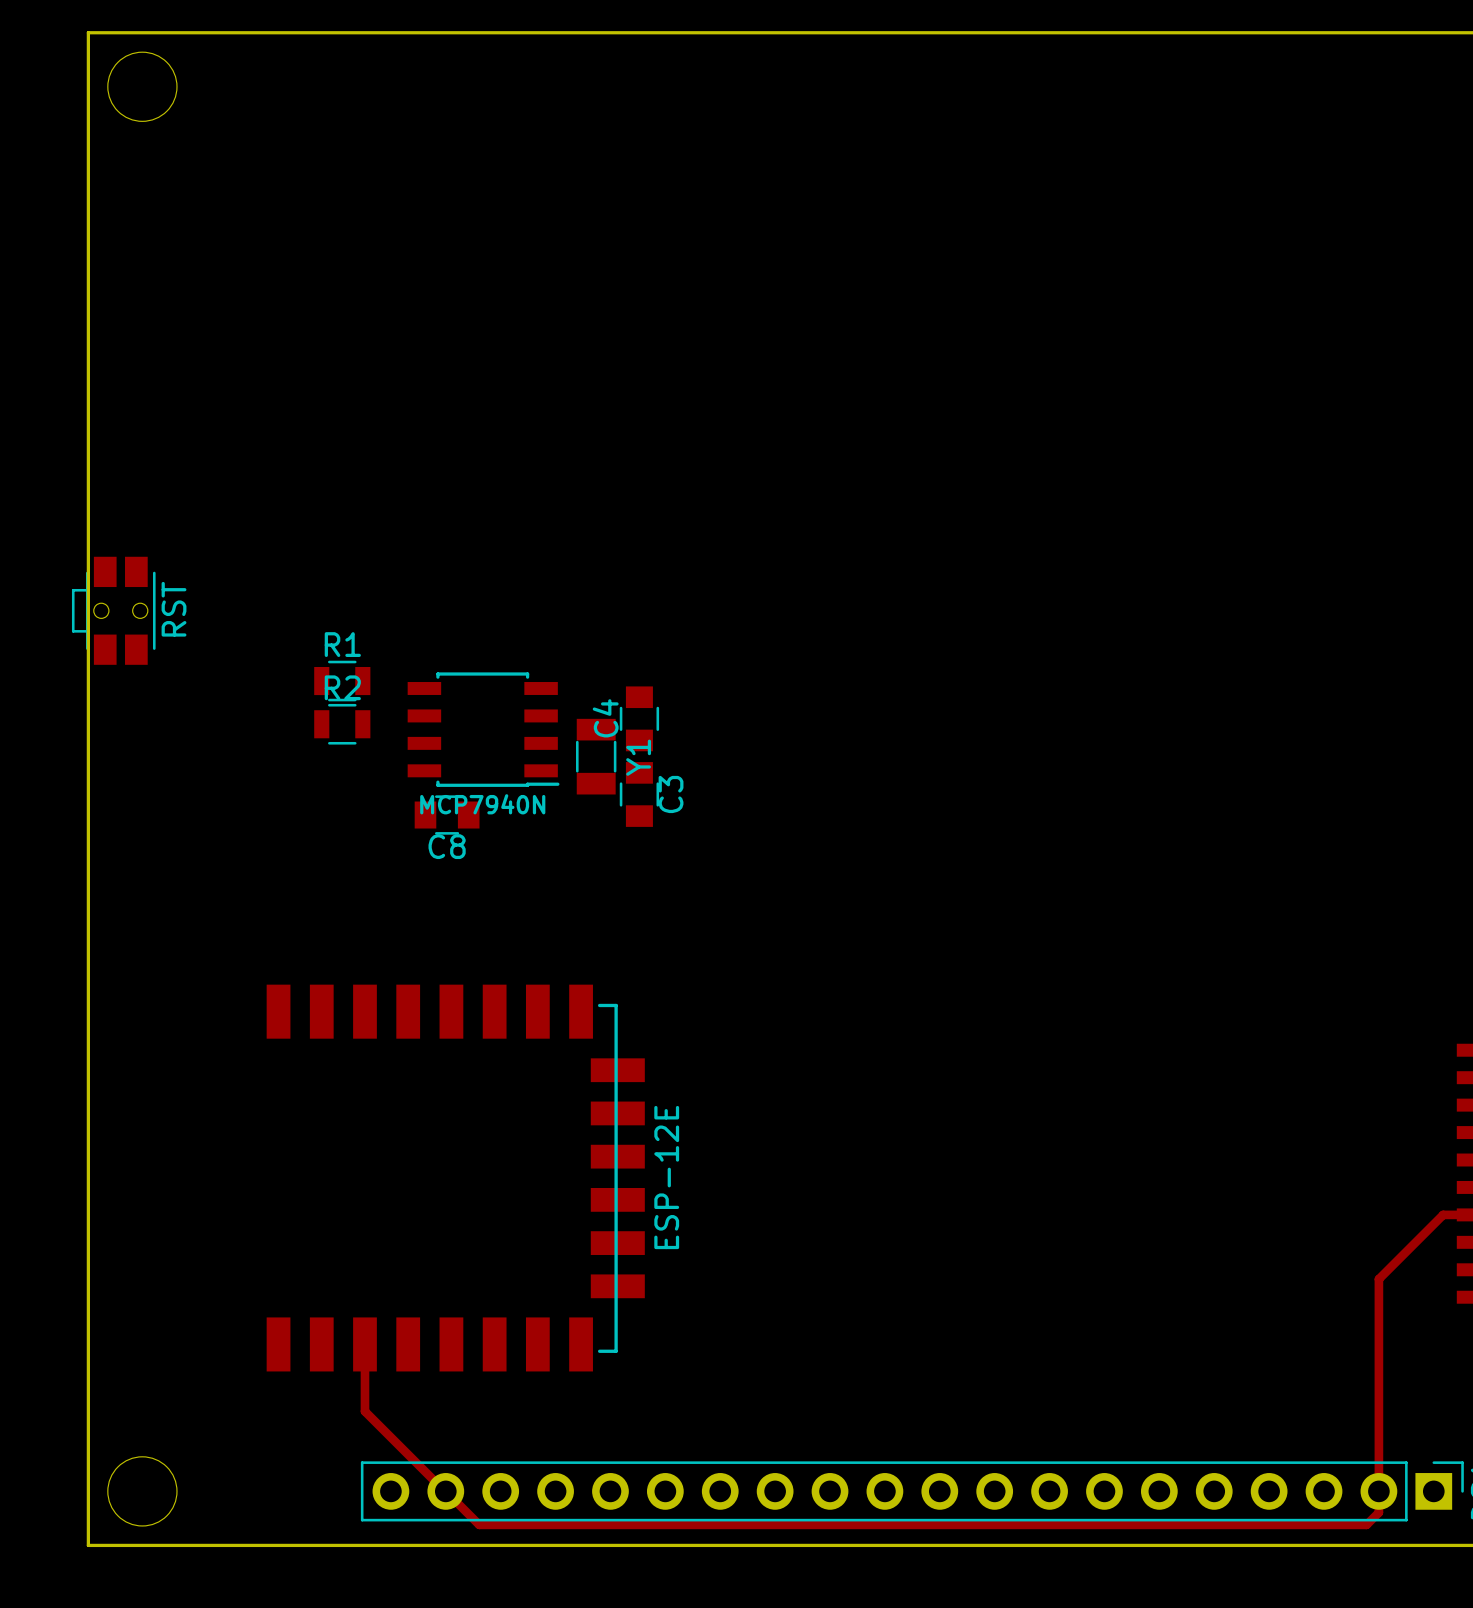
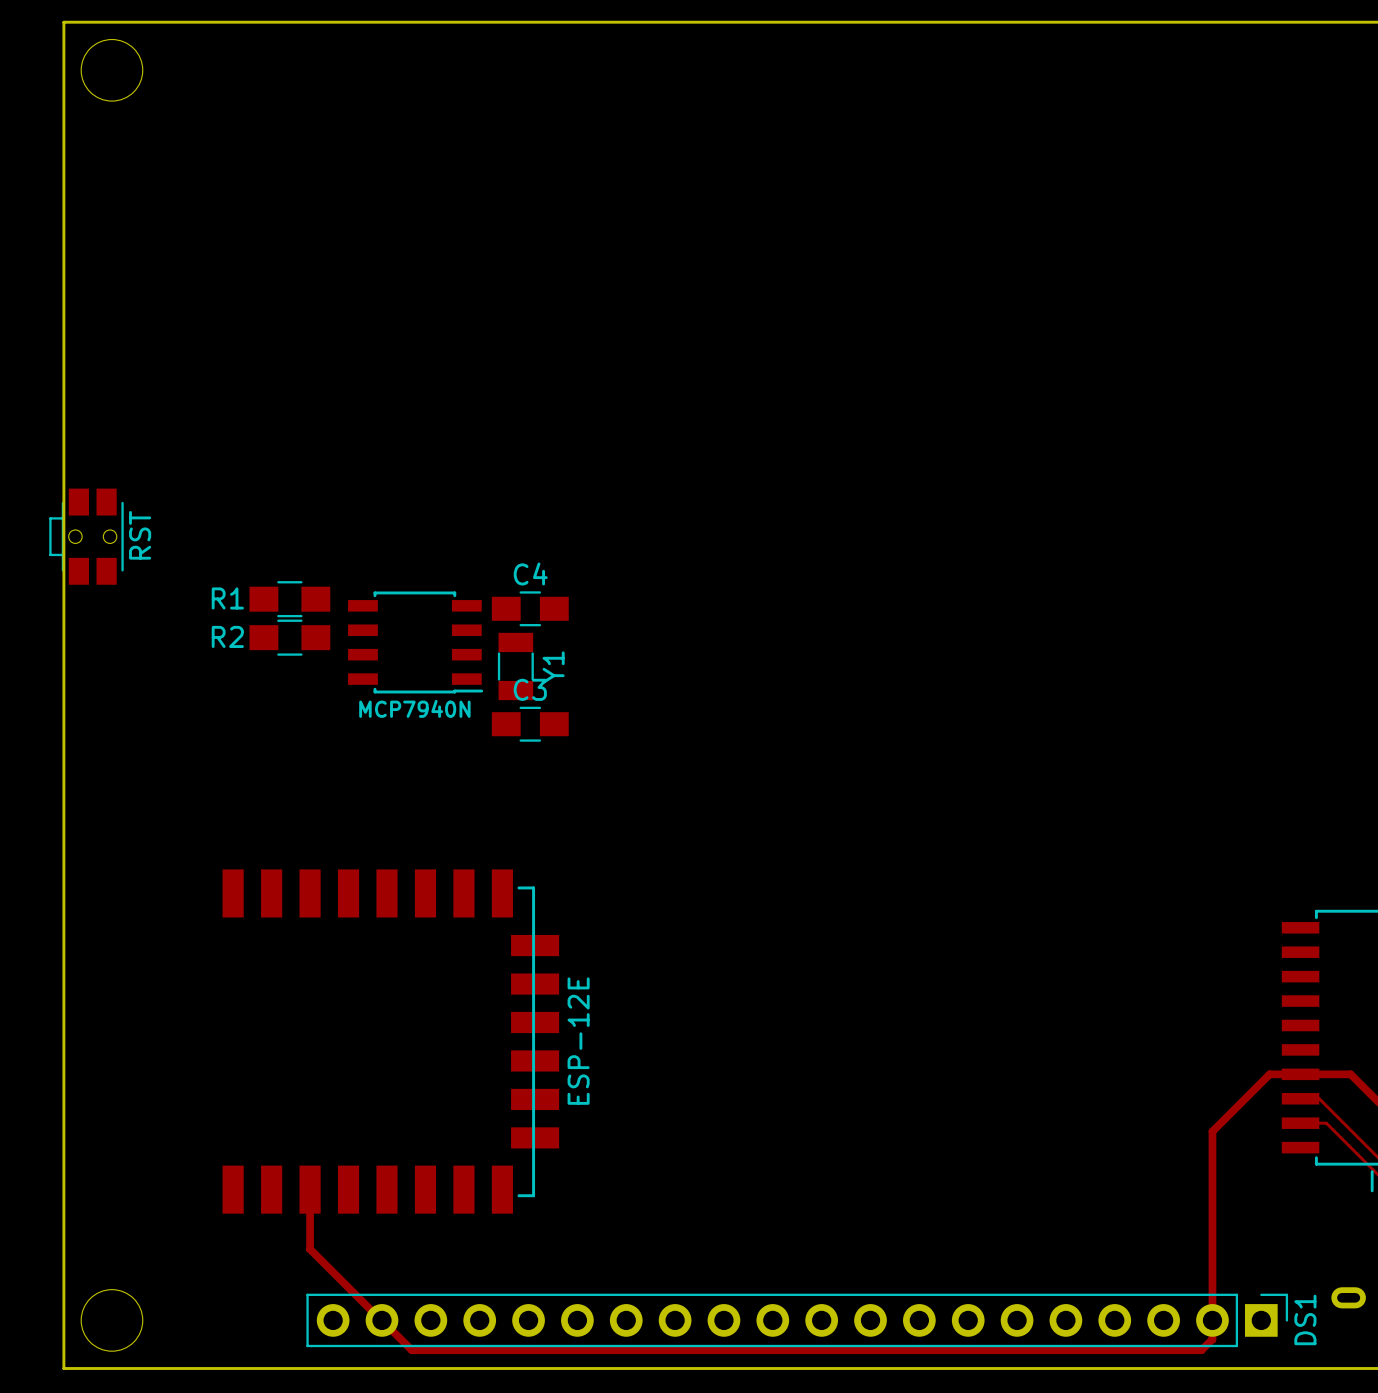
R1 name position: R1 (342, 644) -> R1 (227, 598)
R1 footprint: [314, 660, 371, 702] -> [249, 581, 331, 618]
C4 footprint: [619, 686, 660, 752] -> [491, 591, 569, 627]
R2 name position: R2 (342, 687) -> R2 (227, 636)
R2 footprint: [314, 703, 371, 745] -> [249, 619, 331, 656]
C4 name position: C4 (605, 718) -> C4 (530, 573)
C3 footprint: [619, 762, 660, 827] -> [491, 706, 569, 742]
C3 name position: C3 (671, 794) -> C3 (530, 689)
C8: (447, 815) -> none

